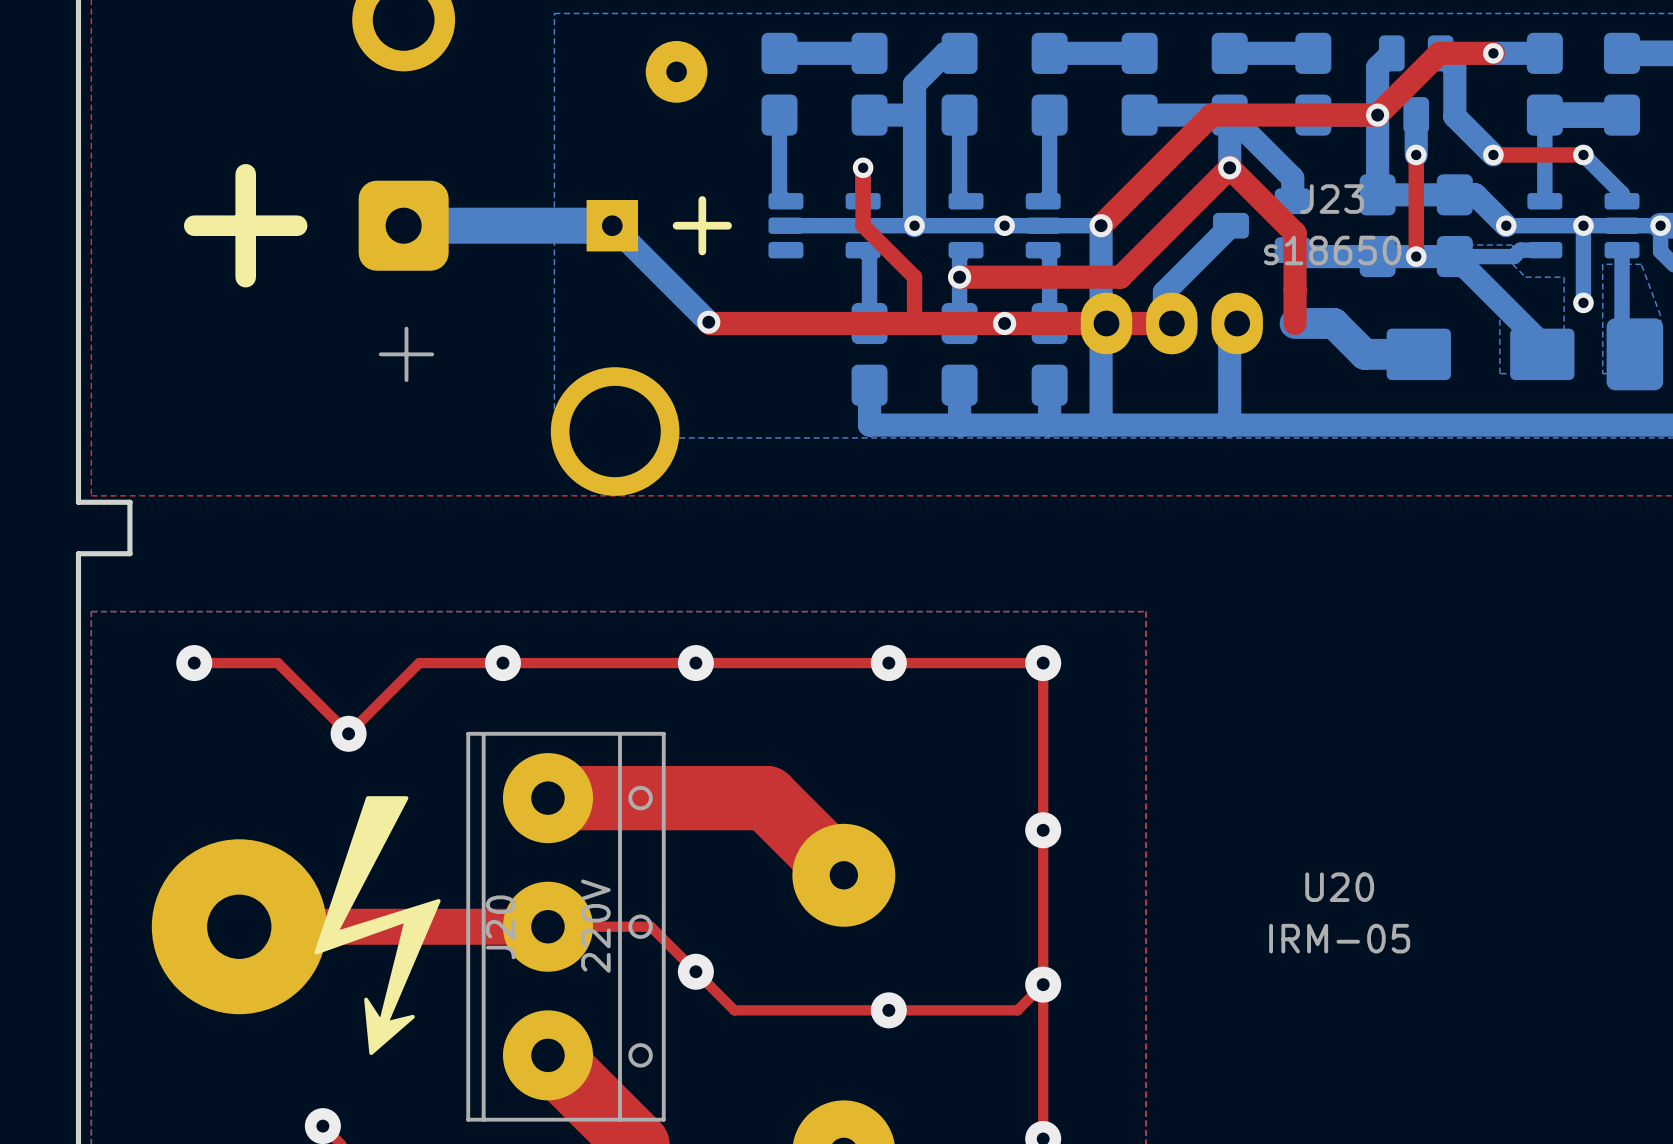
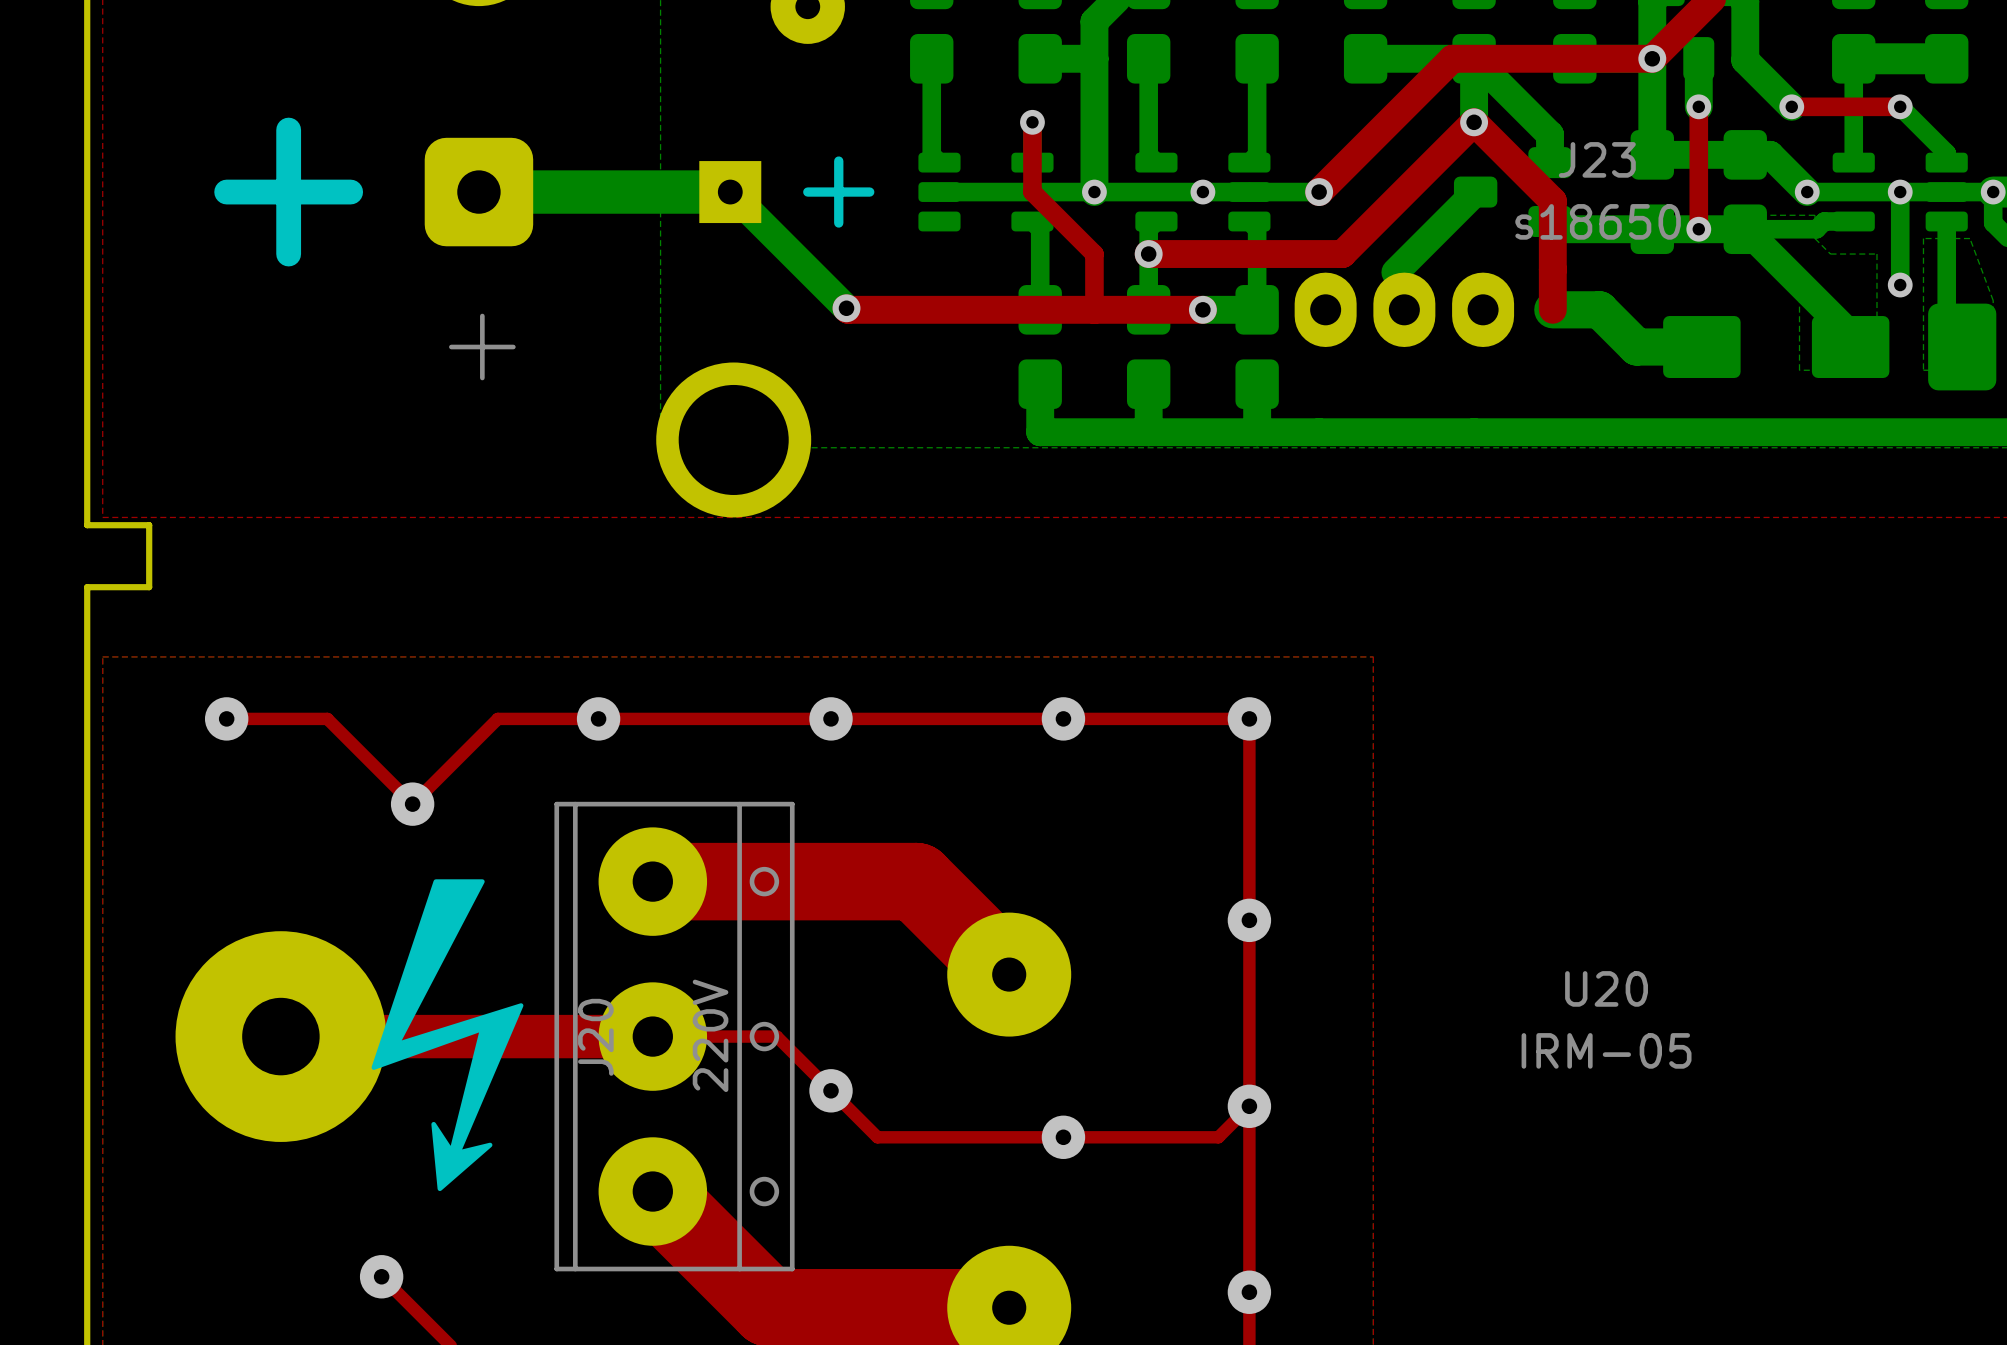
bottom track: (1101, 225) (1101, 425) -> none
top track: (1004, 323) (1164, 323) -> none
bottom track: (1229, 323) (1229, 425) -> none

